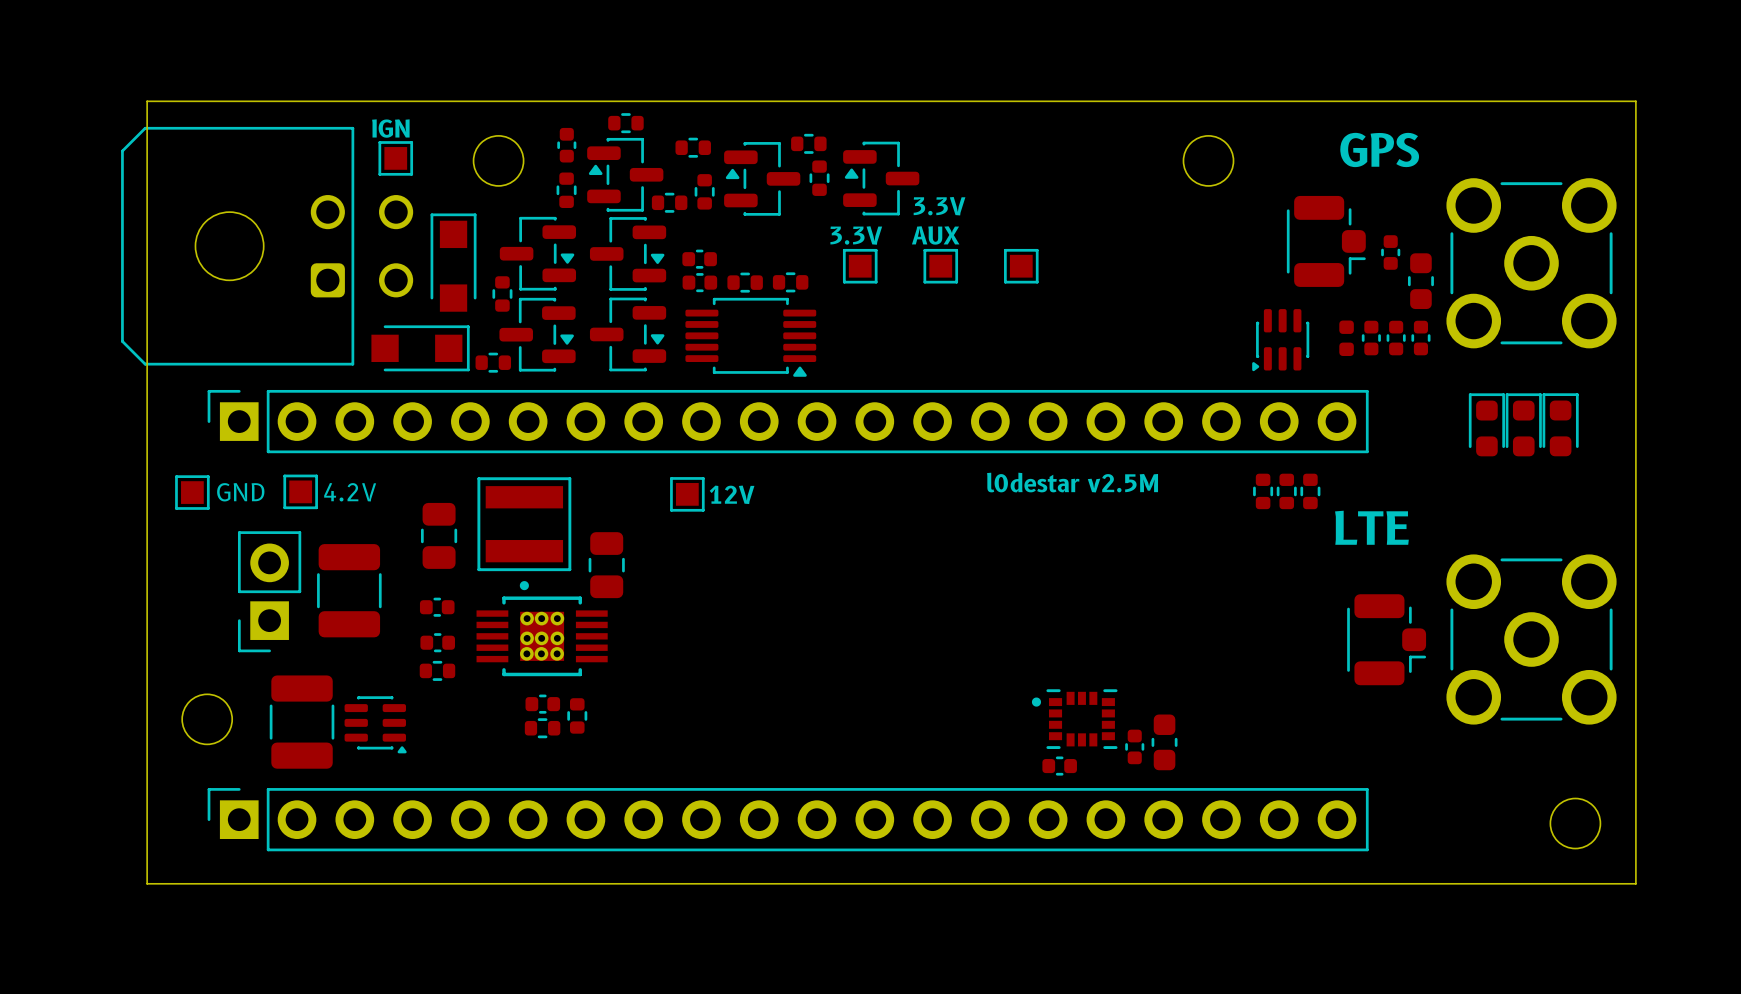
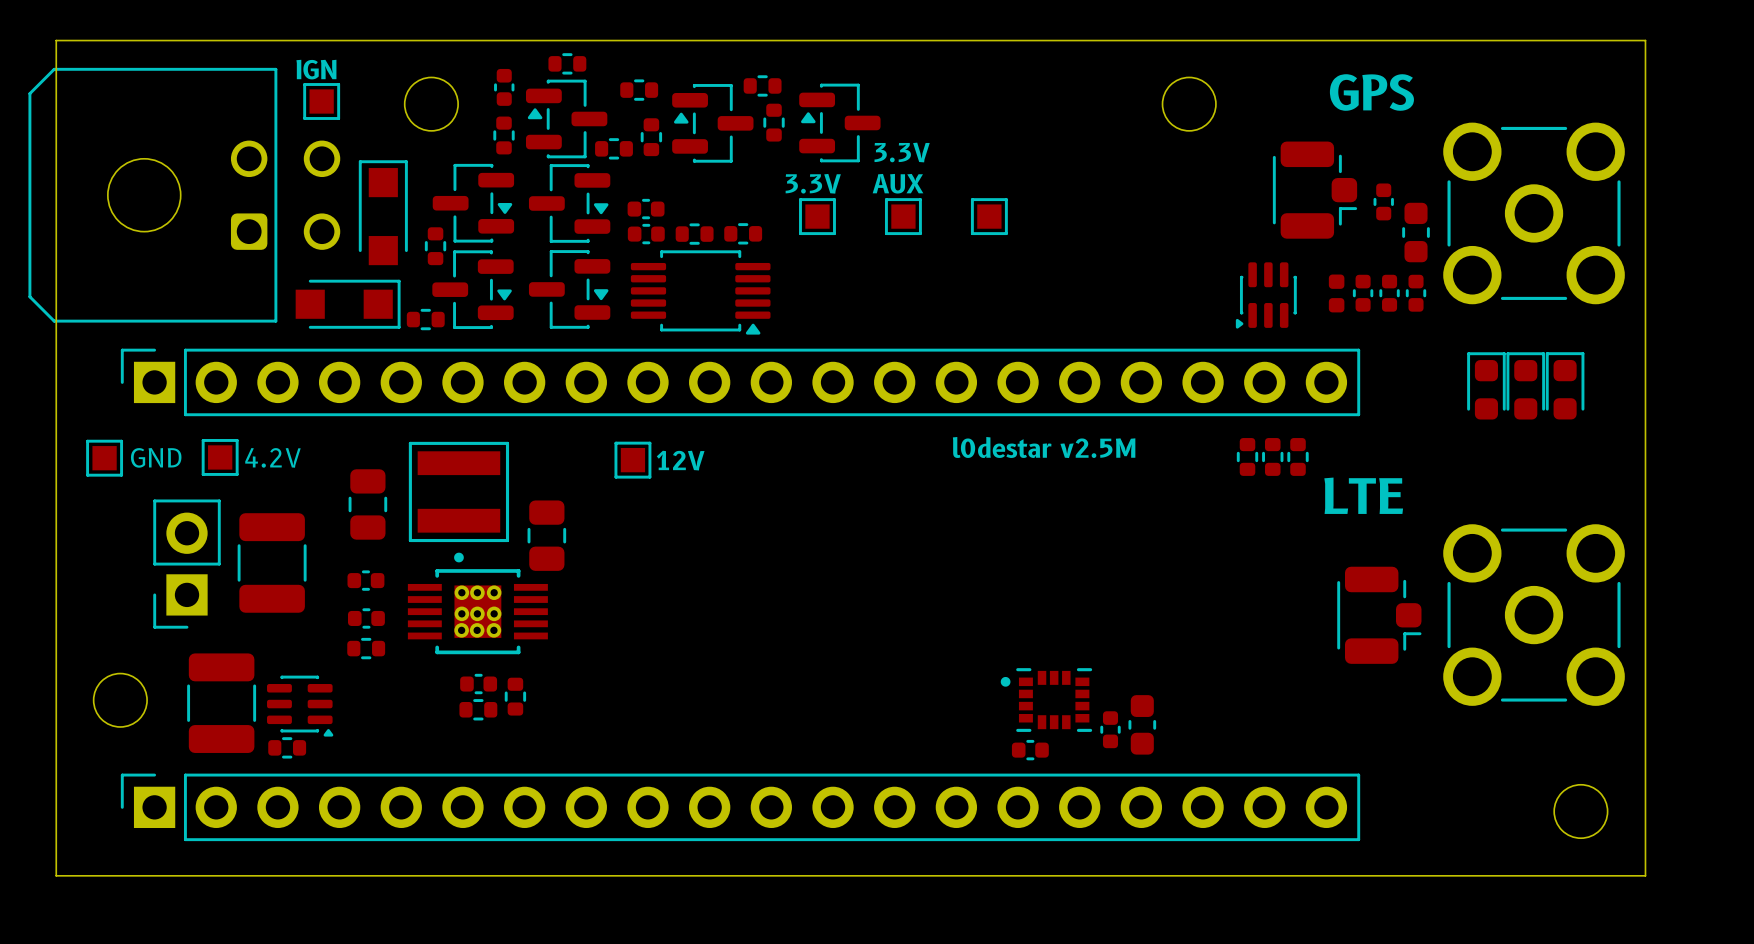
part: none -> (287, 747)

